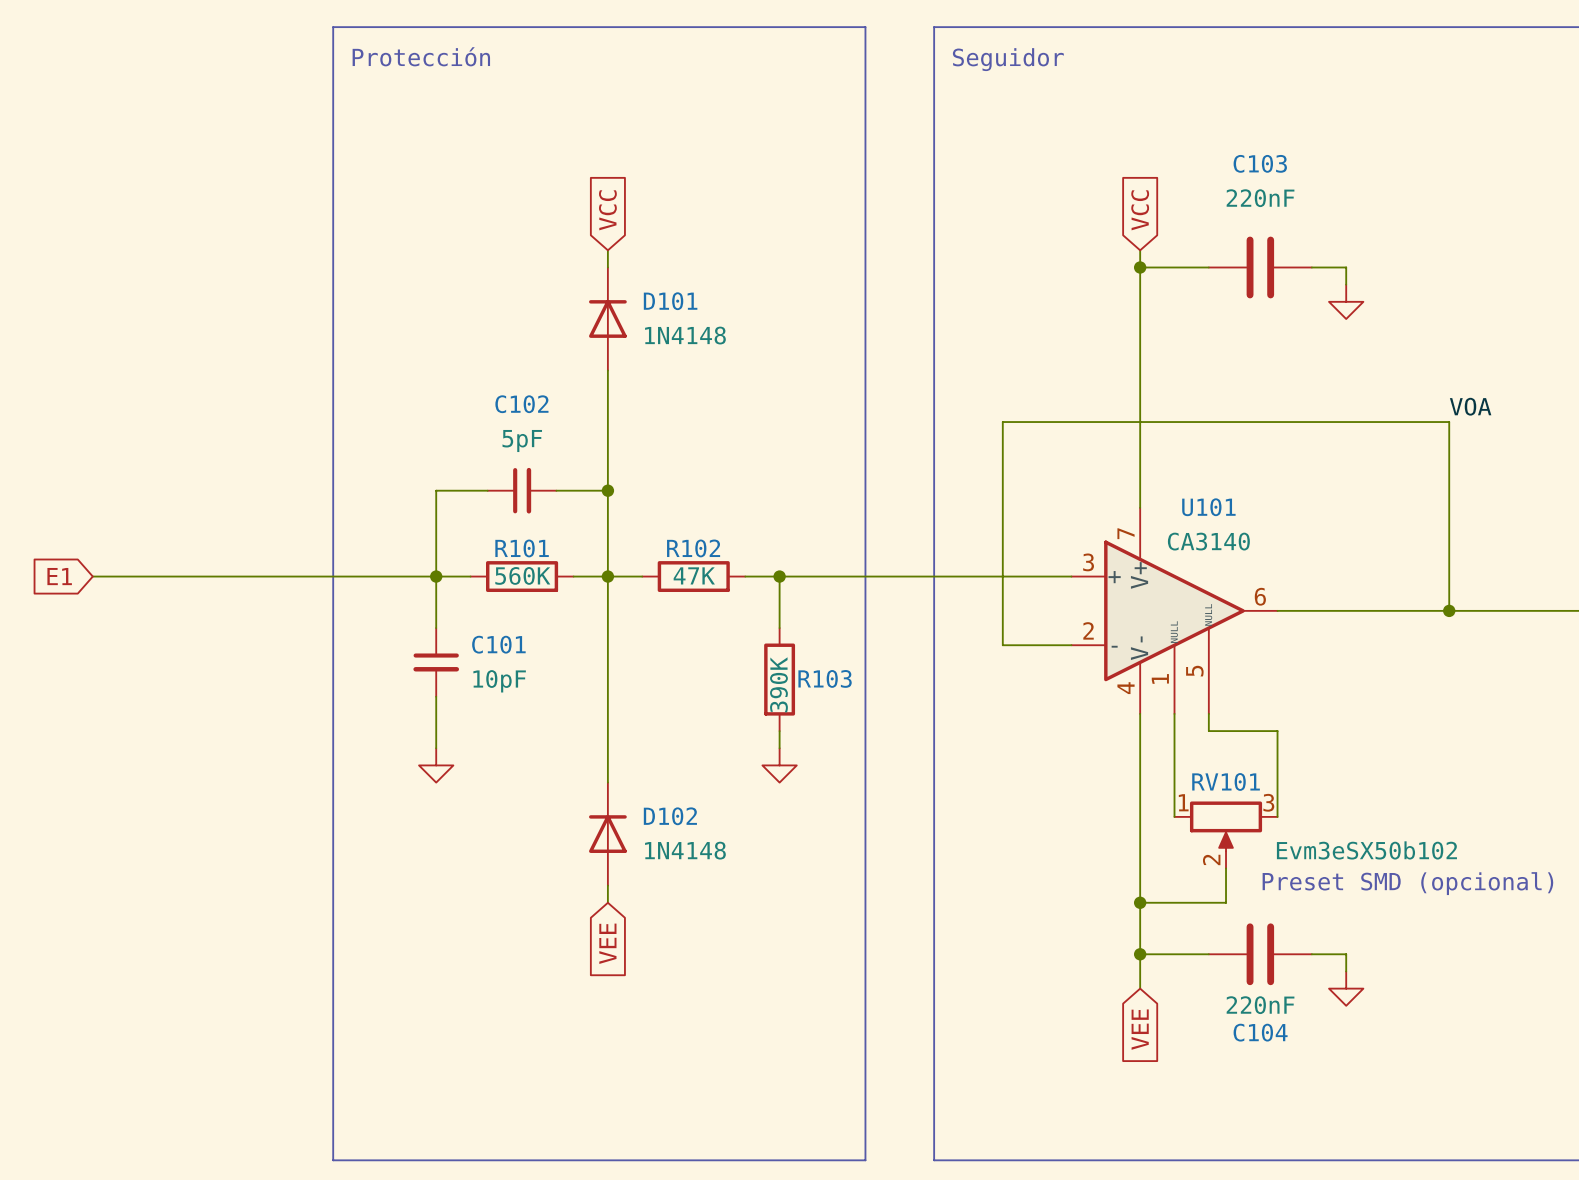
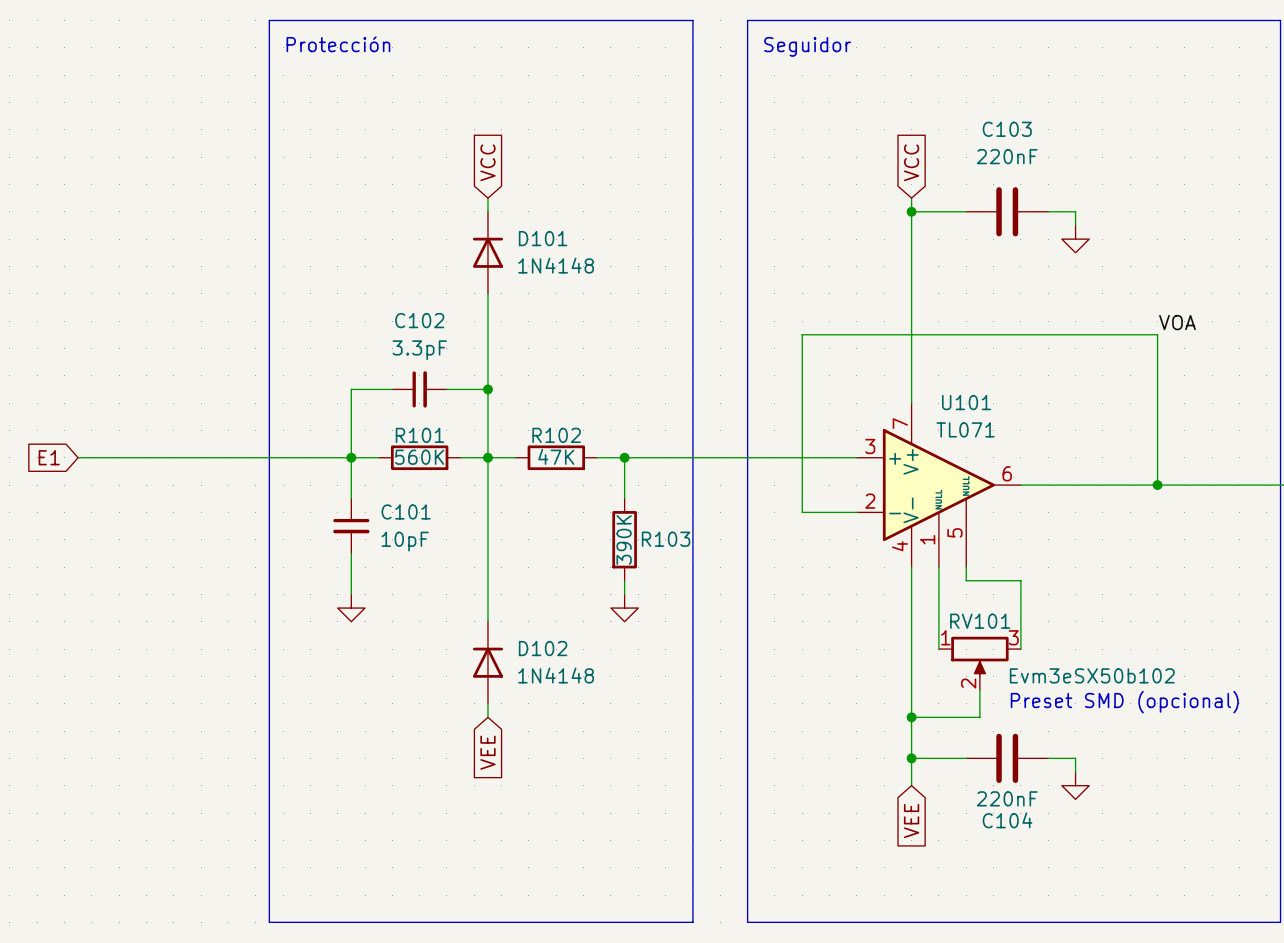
C102 value: 5pF (522, 441) -> 3.3pF (419, 350)
U101 value: CA3140 (1208, 541) -> TL071 (965, 429)

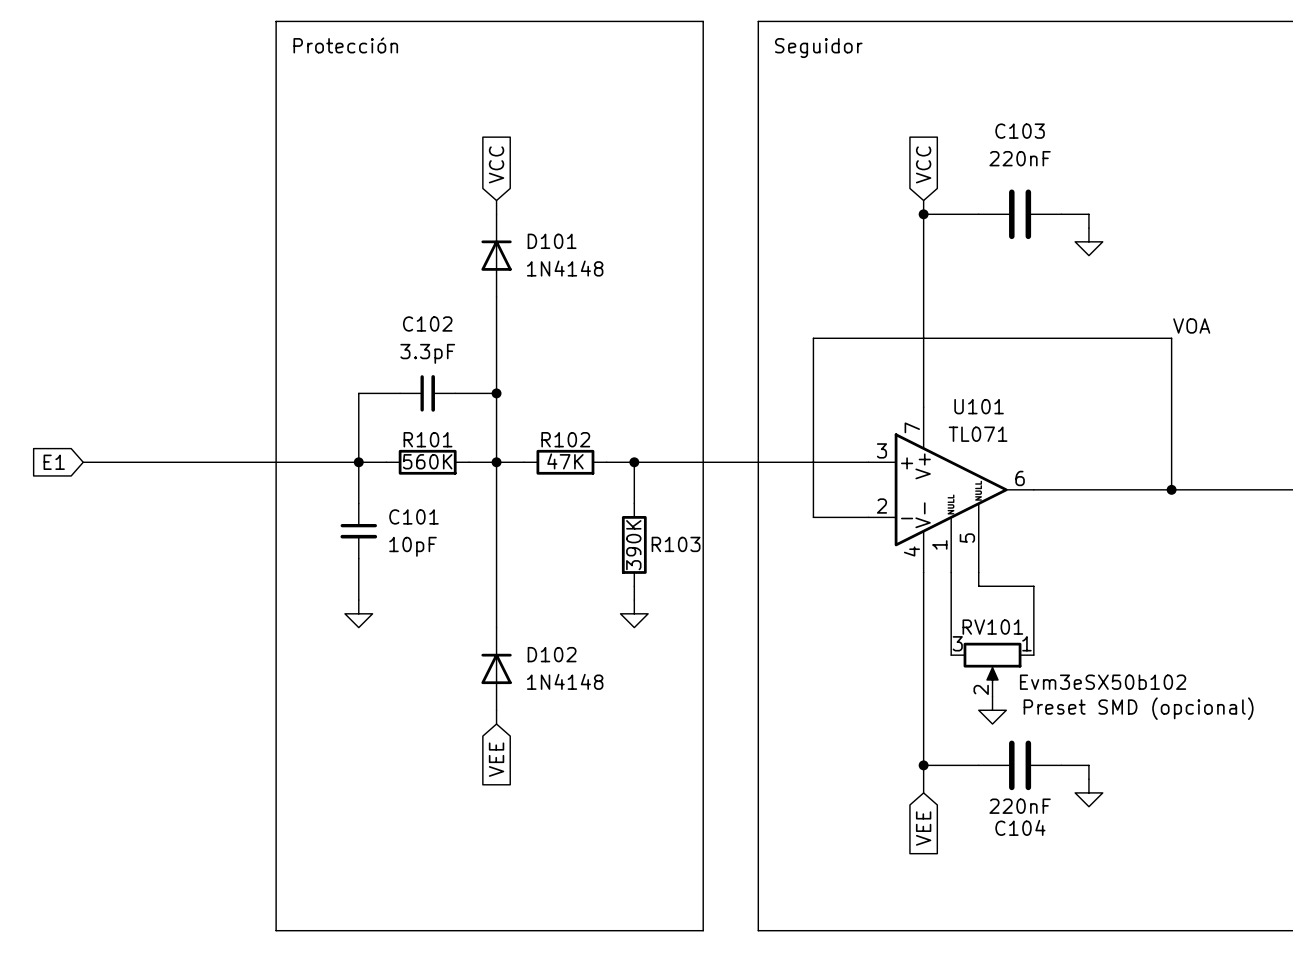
RV101 flip: as is (979, 656) -> left-right (992, 662)
wire: (979, 690) (979, 717) (911, 717) -> none
power symbol: none -> (992, 710)
junction: (911, 717) -> none

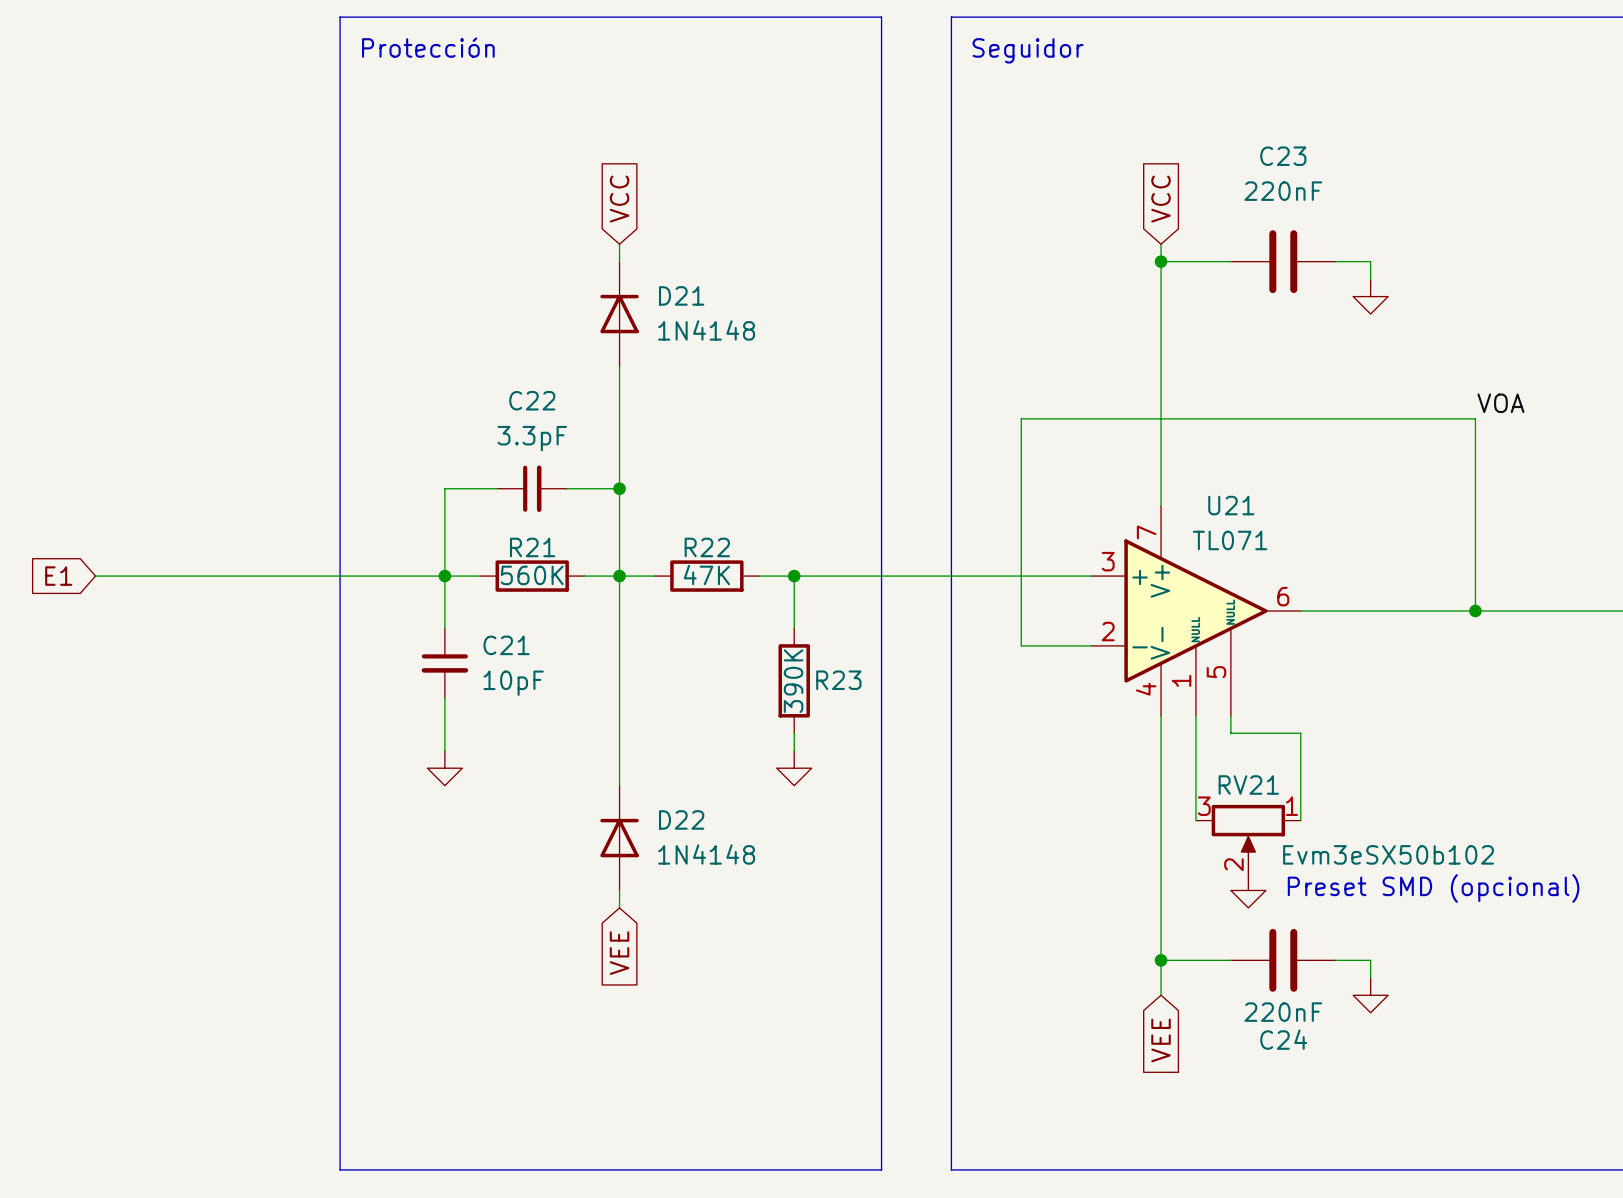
C103 name: C103 (1020, 131) -> C23 (1283, 156)
D101 name: D101 (552, 241) -> D21 (681, 295)
C102 name: C102 (427, 323) -> C22 (532, 400)
U101 name: U101 (979, 406) -> U21 (1231, 505)
R101 name: R101 (427, 439) -> R21 (532, 547)
R102 name: R102 (565, 439) -> R22 (707, 547)
C101 name: C101 (413, 516) -> C21 (506, 645)
R103 name: R103 (676, 544) -> R23 (838, 680)
RV101 name: RV101 (992, 627) -> RV21 (1248, 785)
D102 name: D102 (552, 654) -> D22 (681, 819)
C104 name: C104 (1020, 827) -> C24 (1283, 1039)

